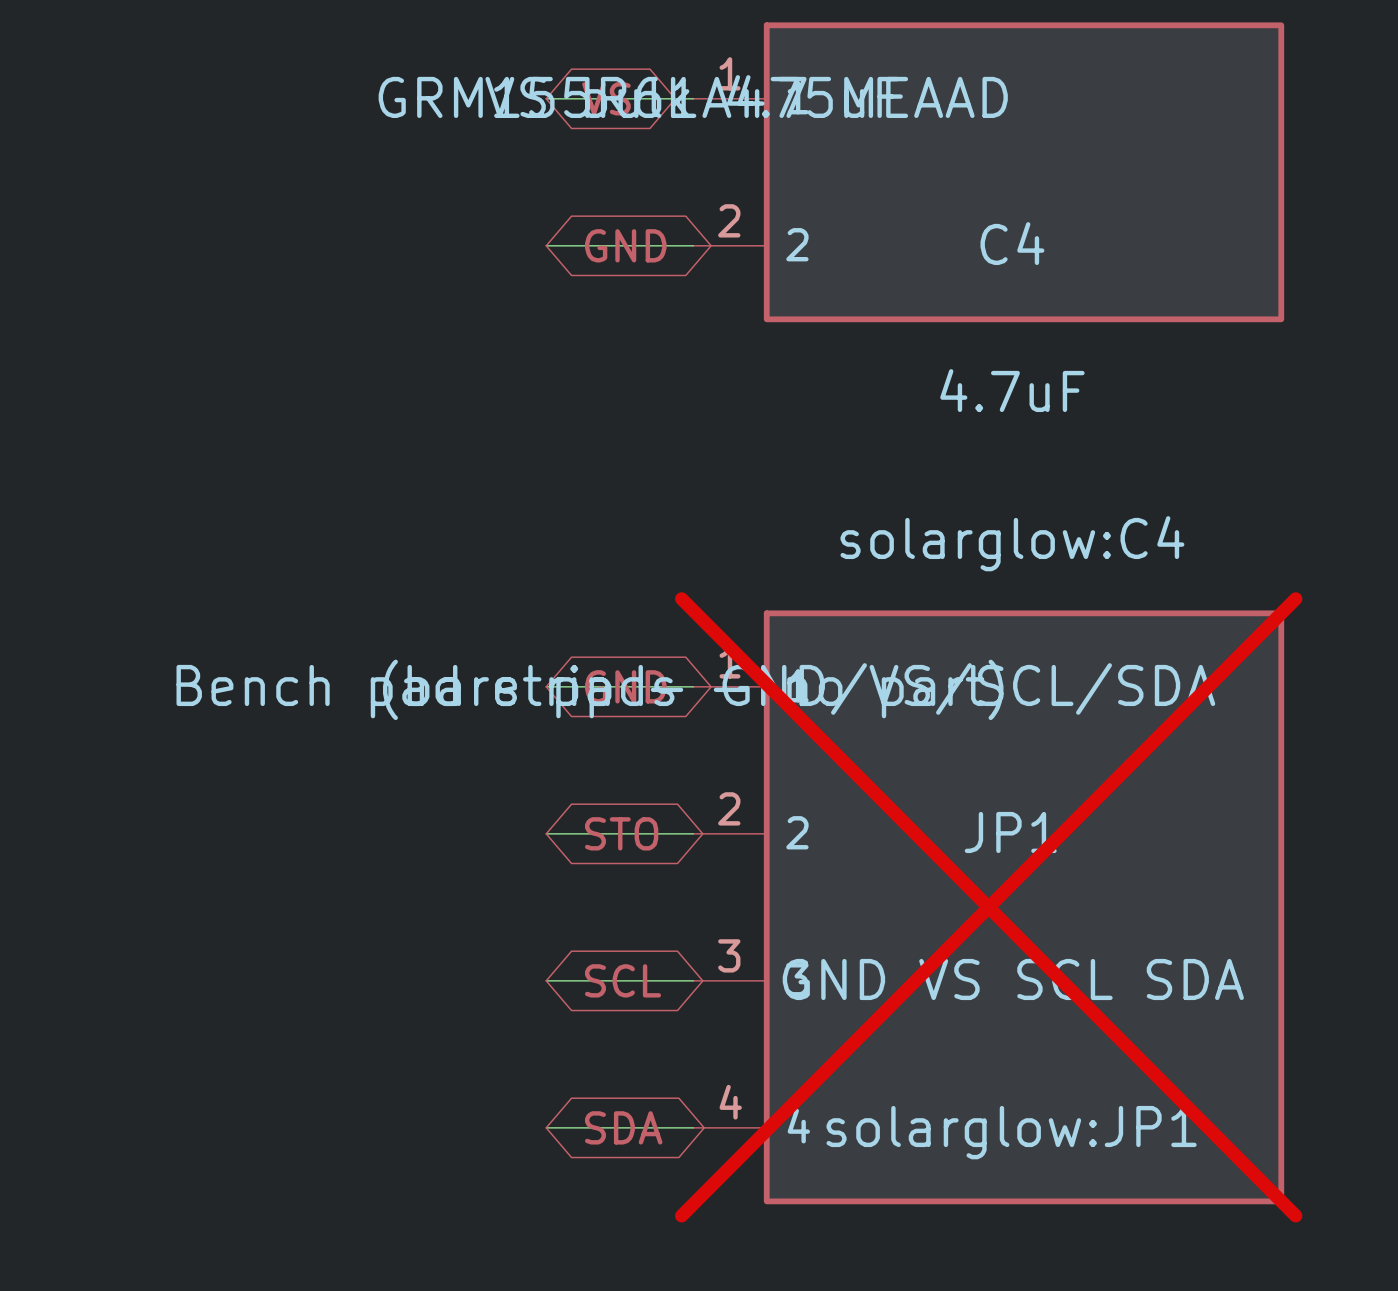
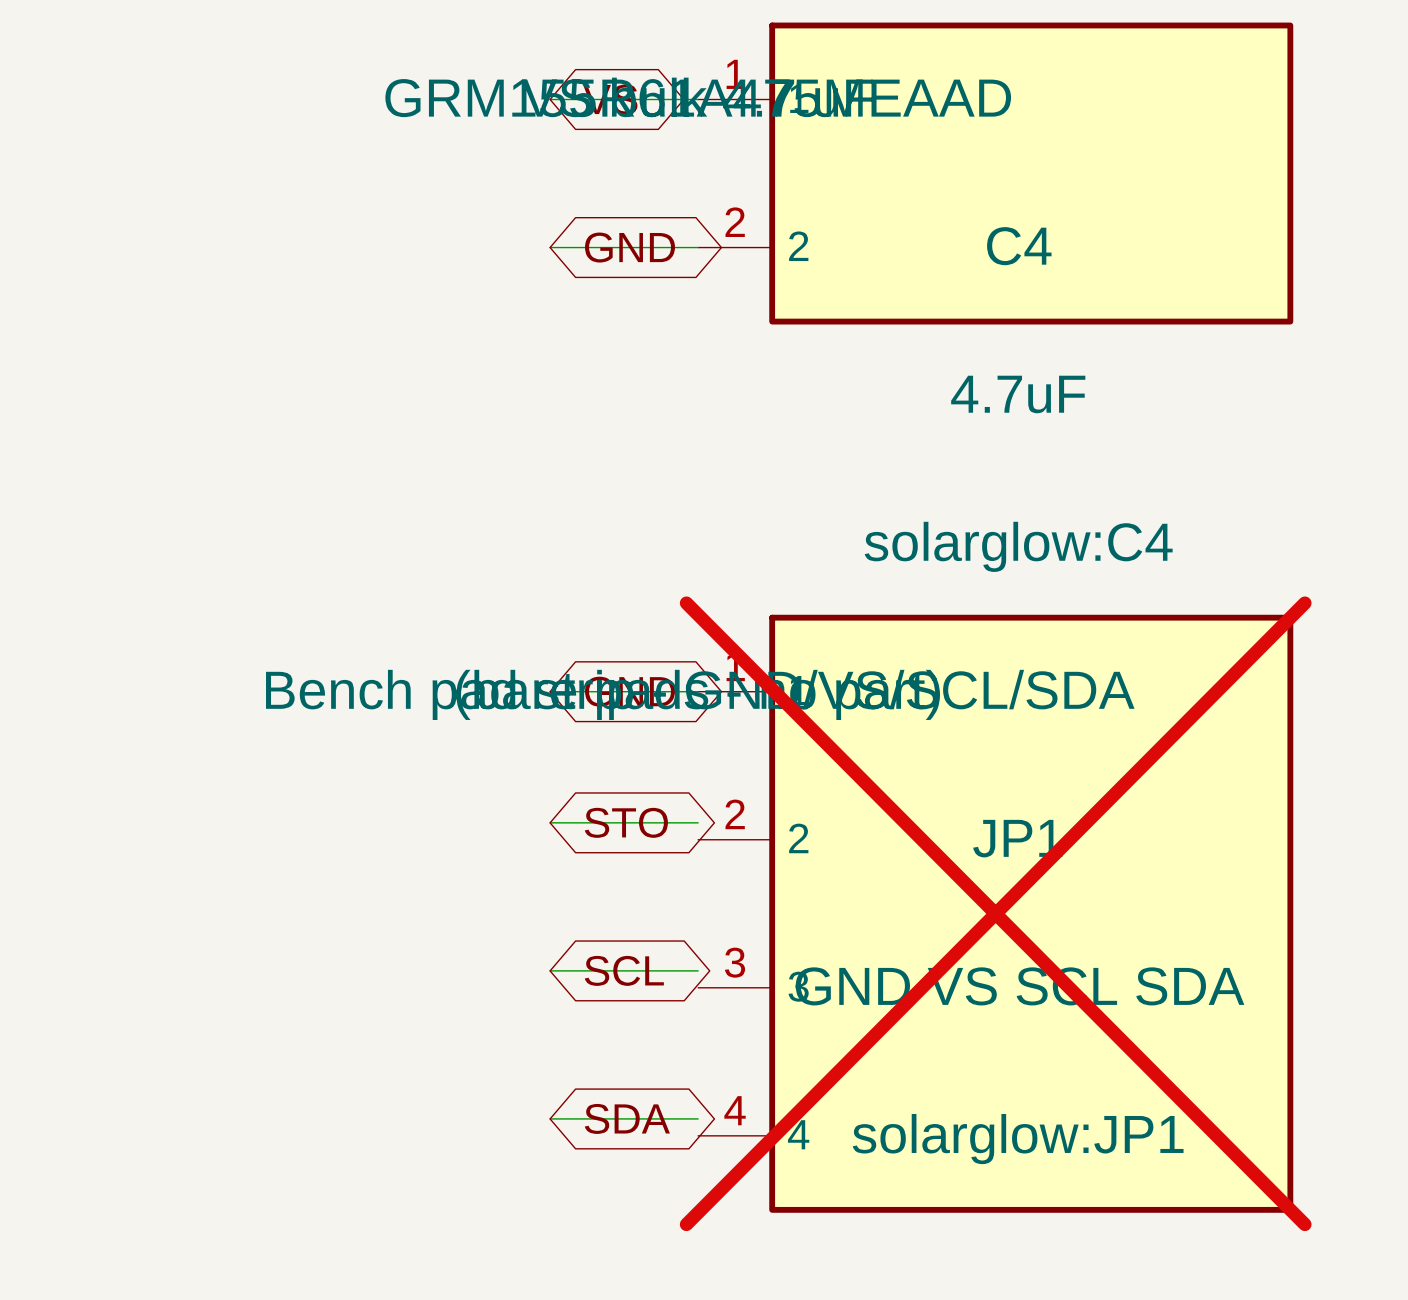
wire: (546, 833) (693, 833) -> (550, 822) (698, 822)
global label position: STO (621, 833) -> STO (626, 822)
wire: (546, 980) (693, 980) -> (550, 970) (698, 970)
global label position: SCL (623, 980) -> SCL (624, 970)
wire: (546, 1127) (693, 1127) -> (550, 1118) (698, 1118)
global label position: SDA (623, 1127) -> SDA (627, 1118)

